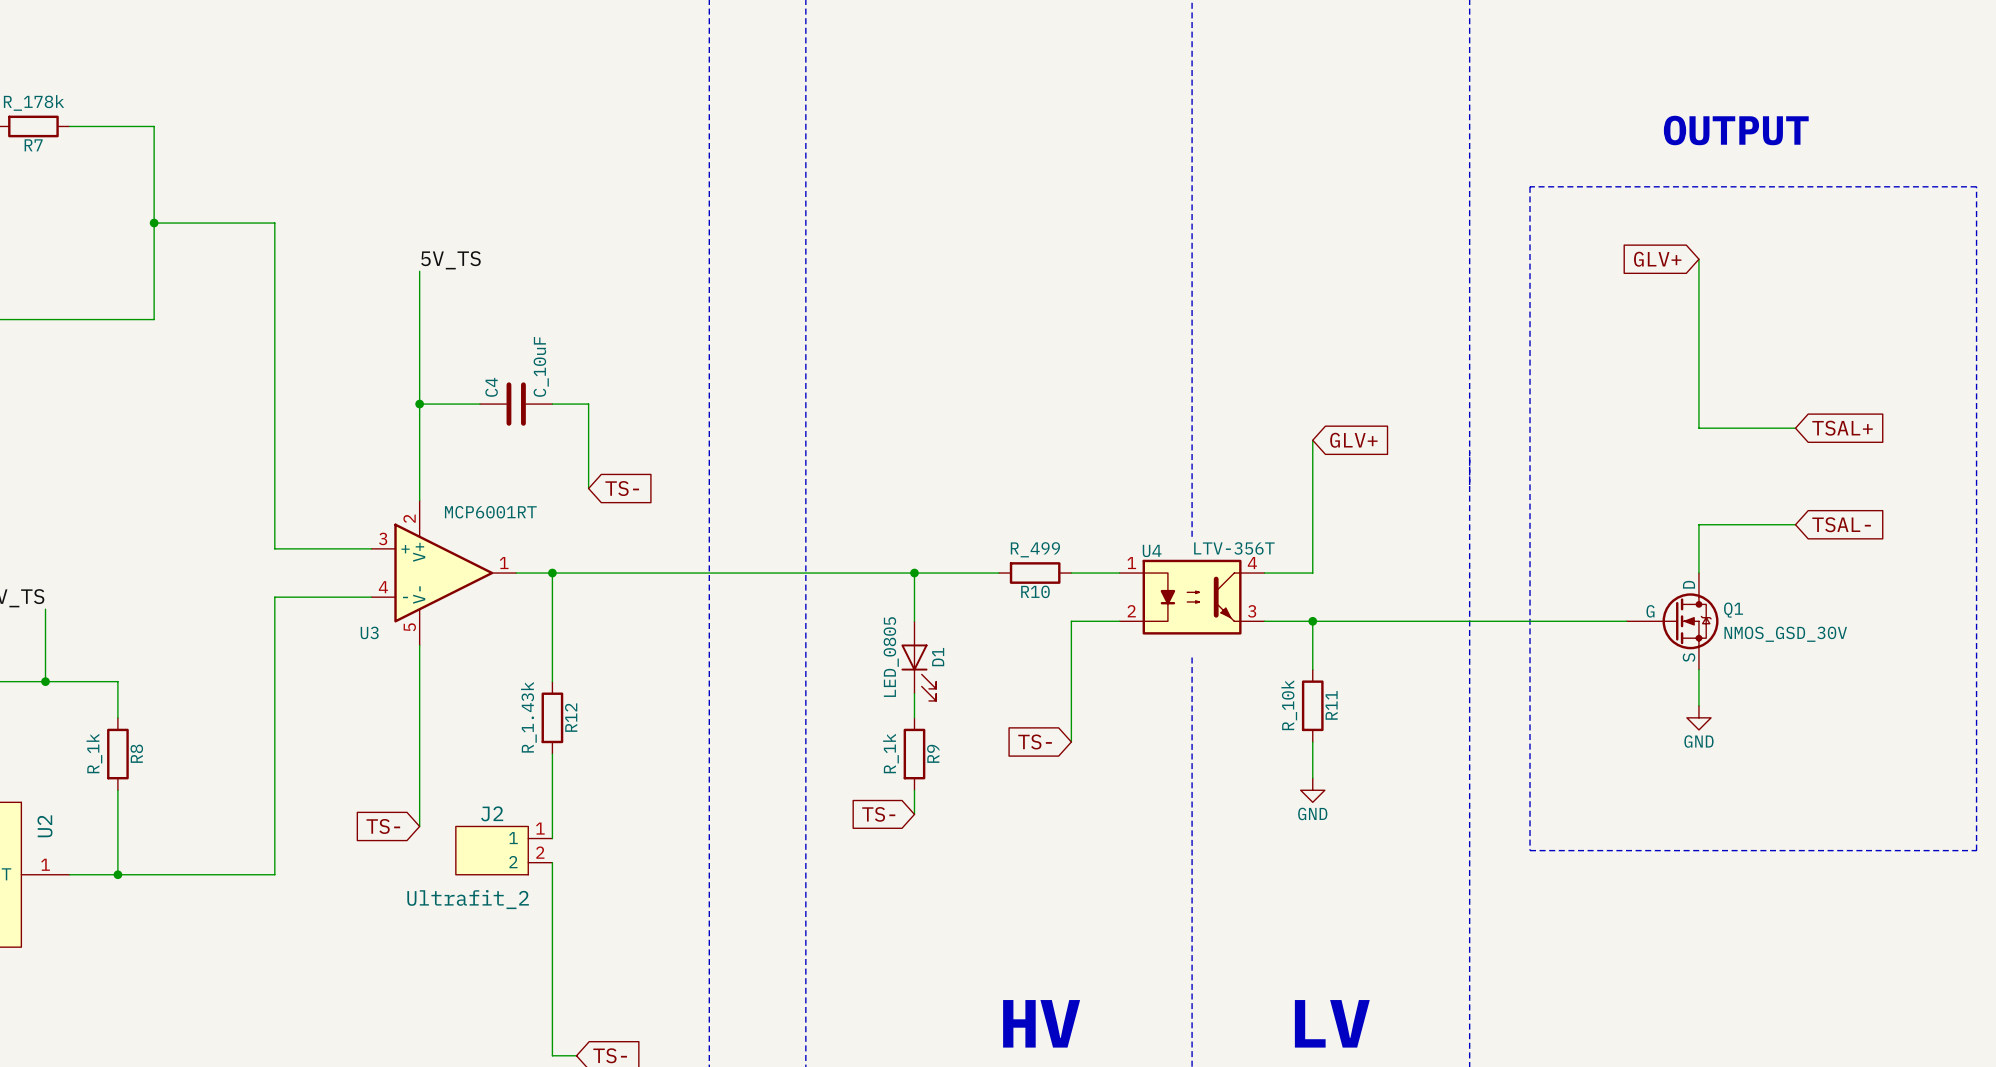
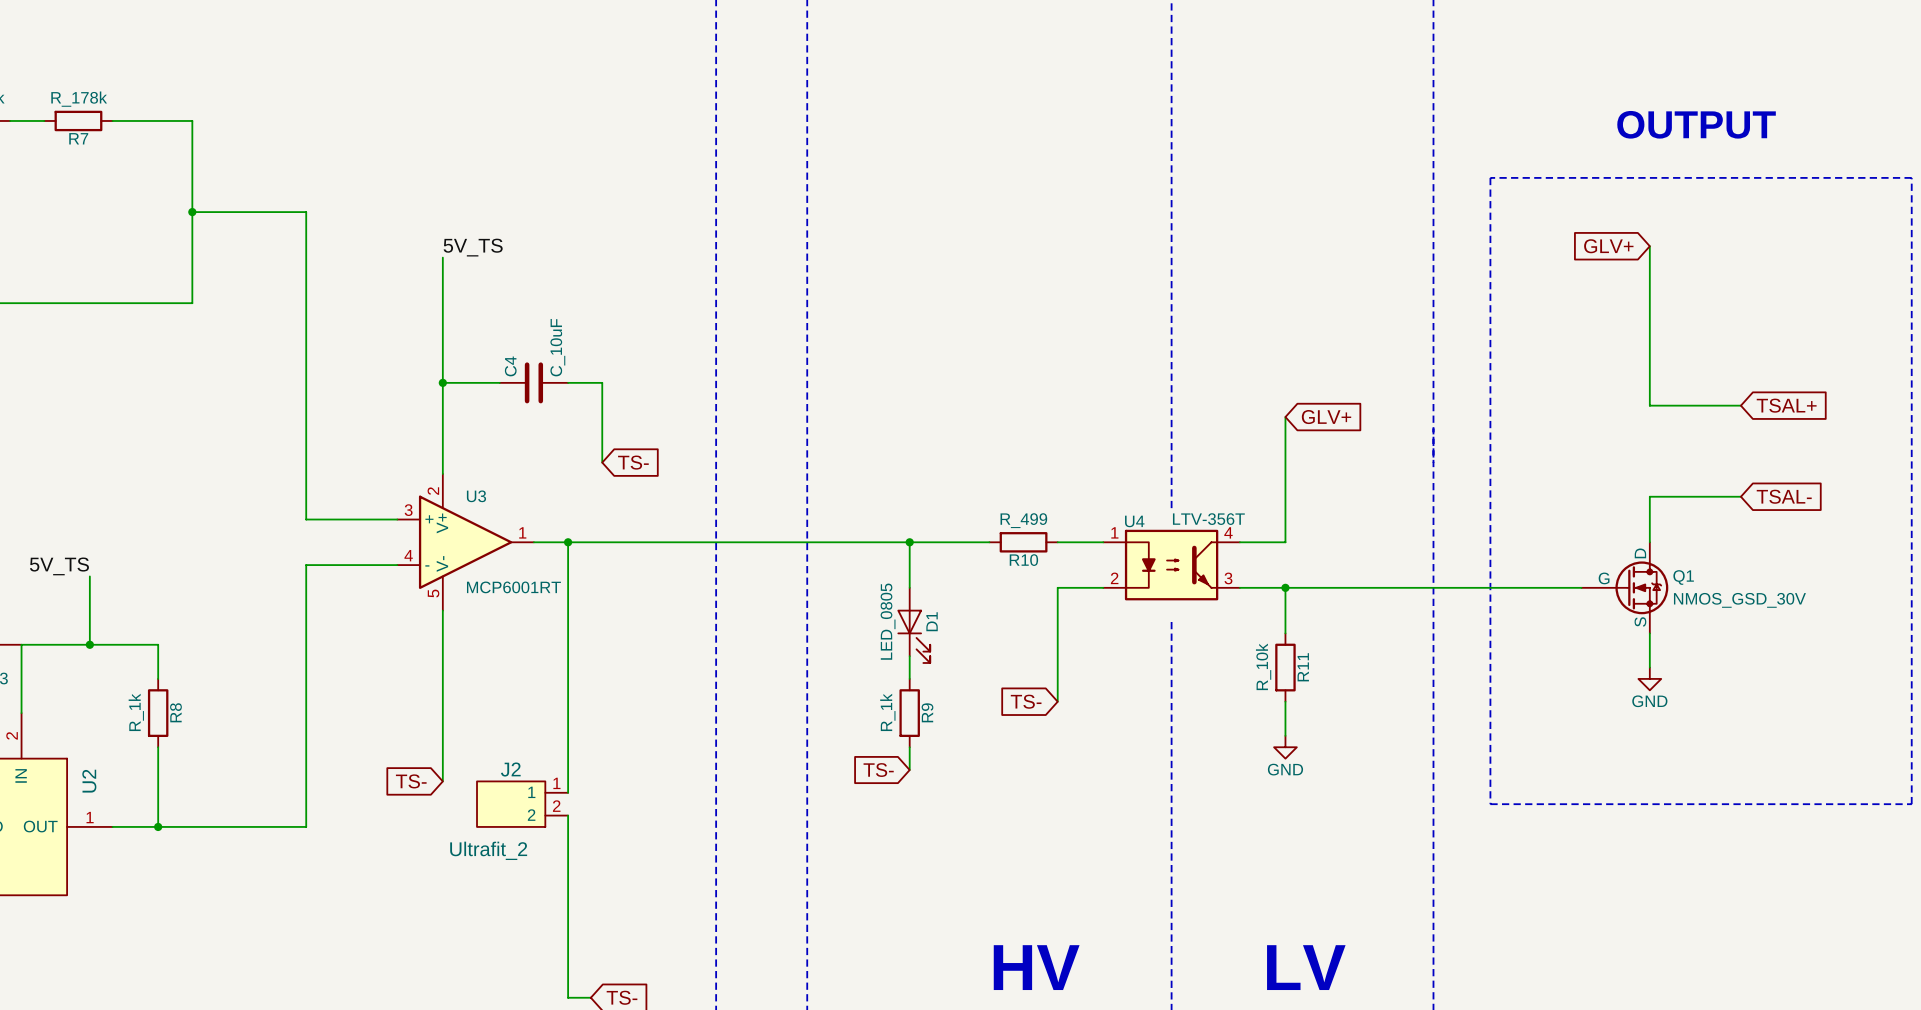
U3 value position: MCP6001RT (490, 512) -> MCP6001RT (513, 587)
U3 name position: U3 (369, 632) -> U3 (476, 496)
wire: none -> (568, 644) (568, 713)
R12: R_1.43k (552, 717) -> none

